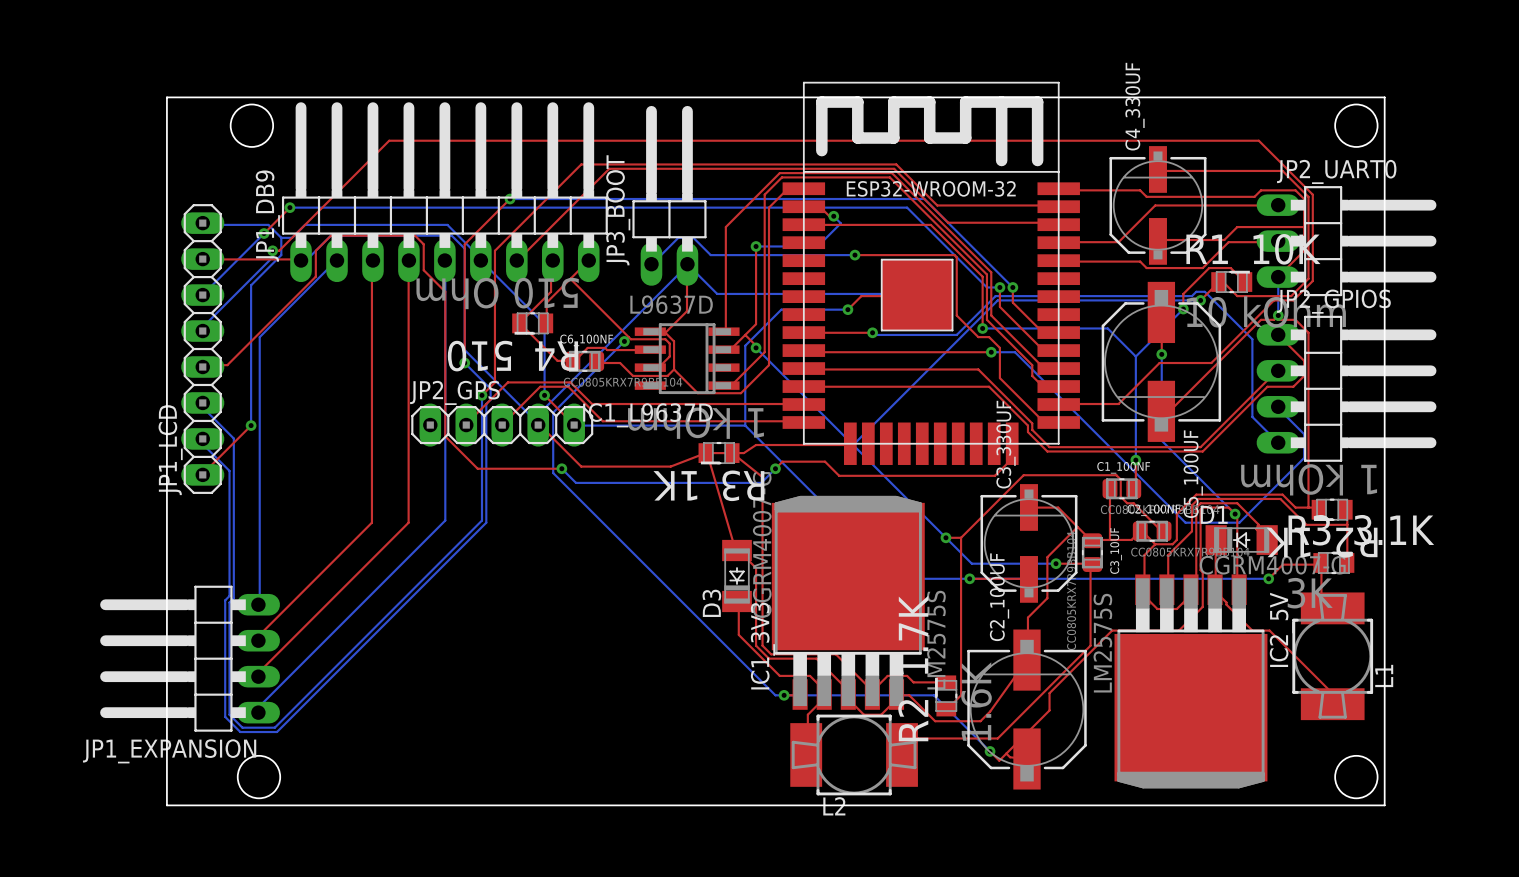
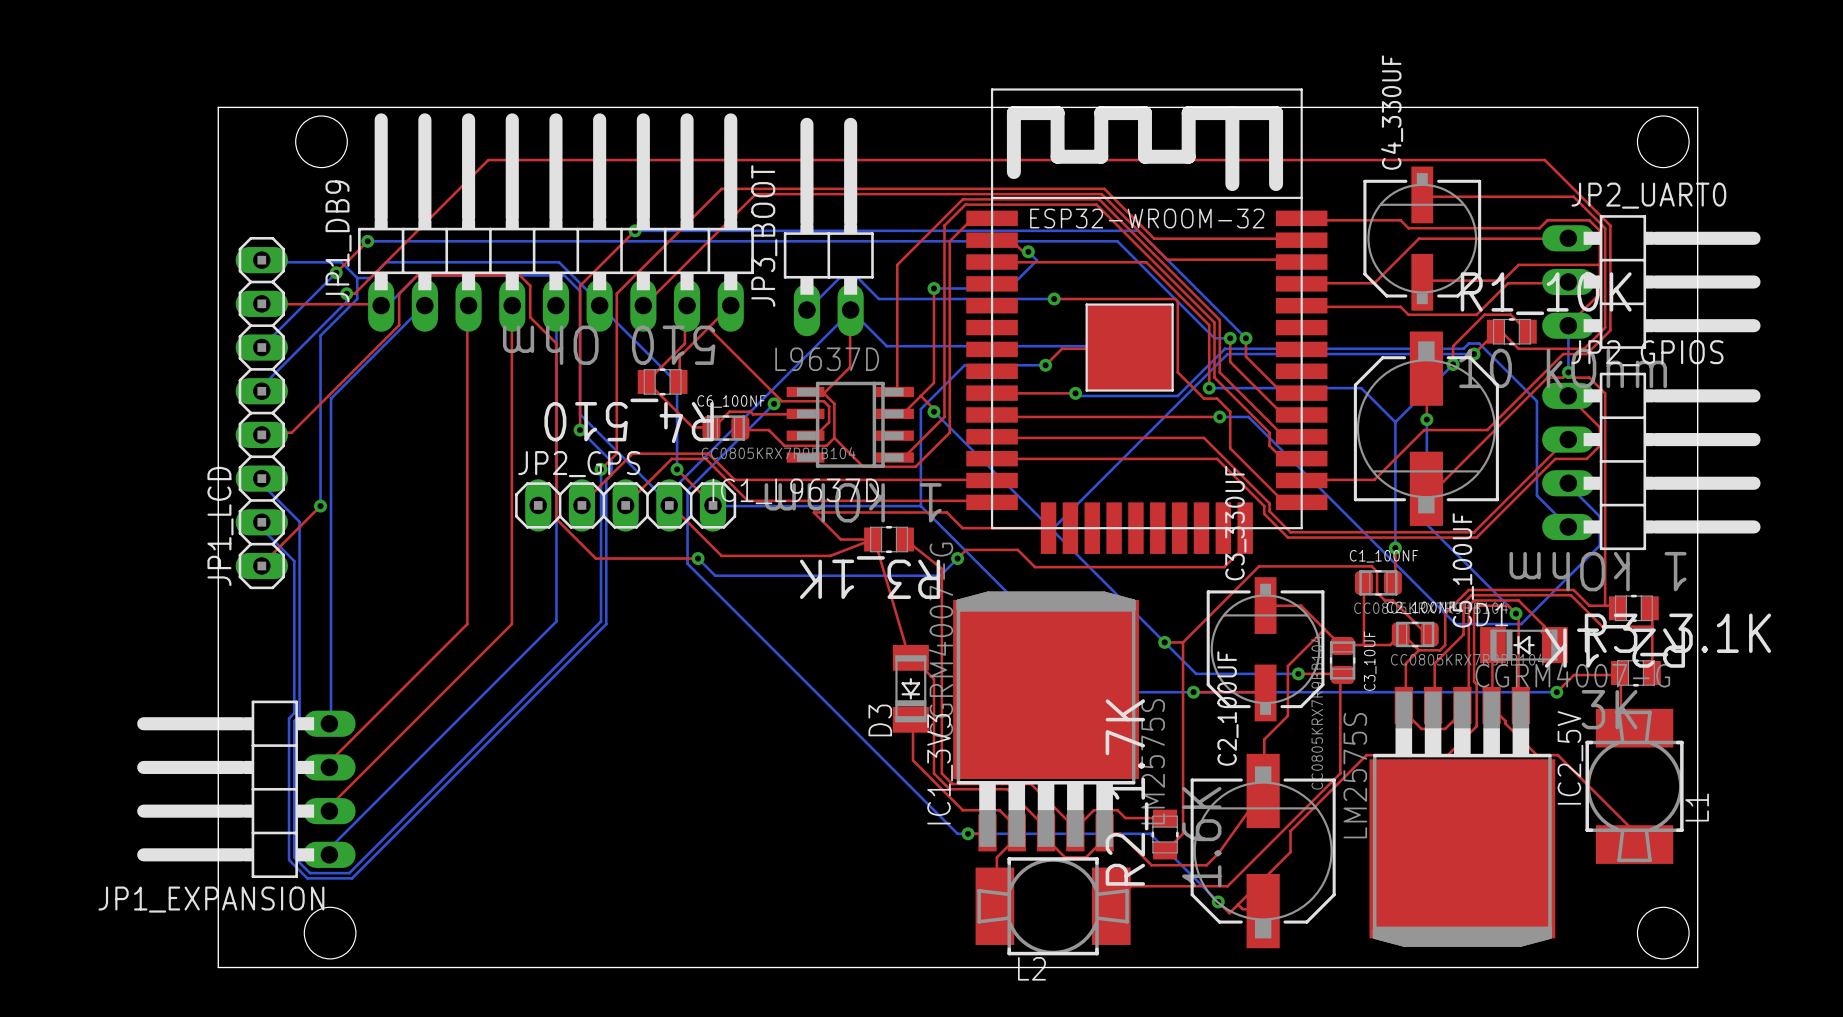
top track: (850, 443) (756, 445) (743, 453) (705, 453) -> (1048, 528) (962, 528) (946, 512) (813, 512) (840, 539) (872, 539)

